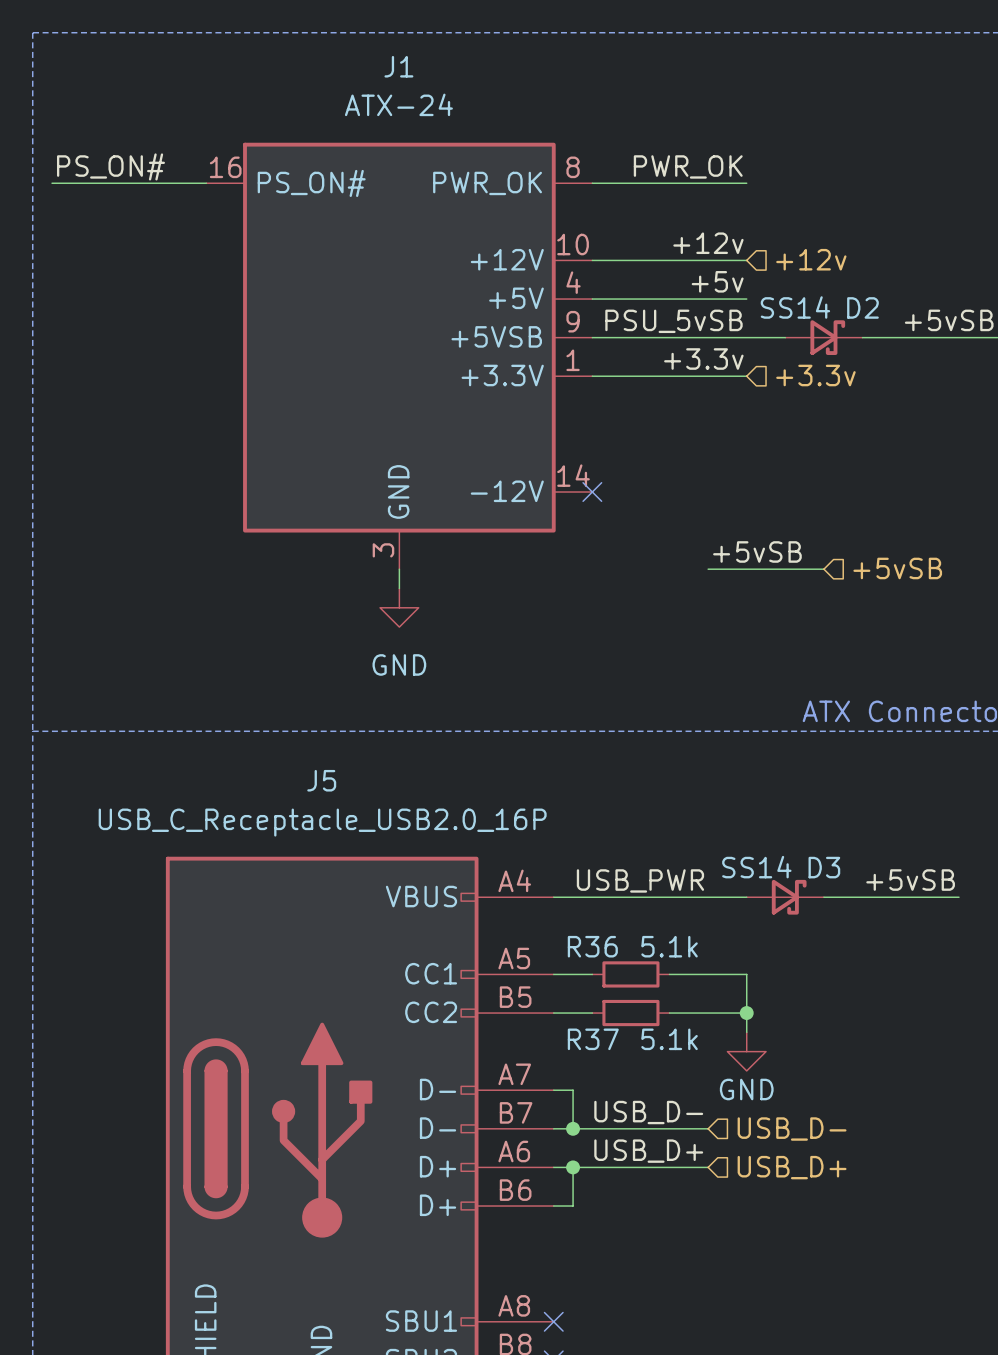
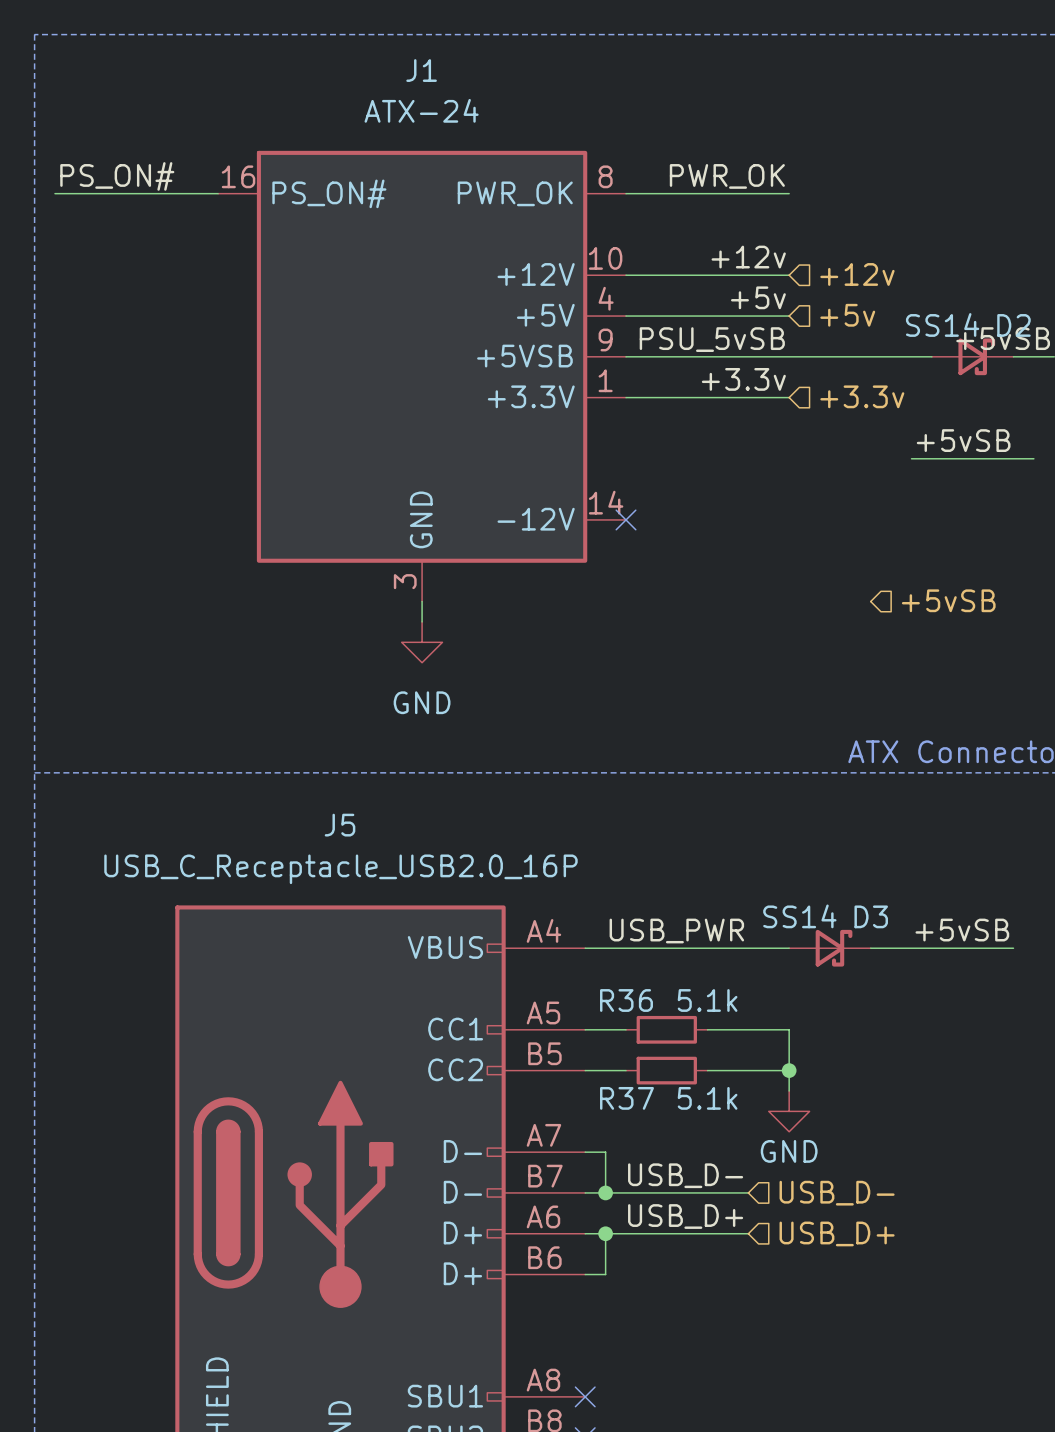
hierarchical label: none -> +5v (847, 315)
D2 position: (823, 337) -> (972, 356)
label: none -> +5vSB (963, 440)
label: +5vSB (757, 551) -> none
wire: (708, 569) (823, 569) -> (911, 458) (1033, 458)

